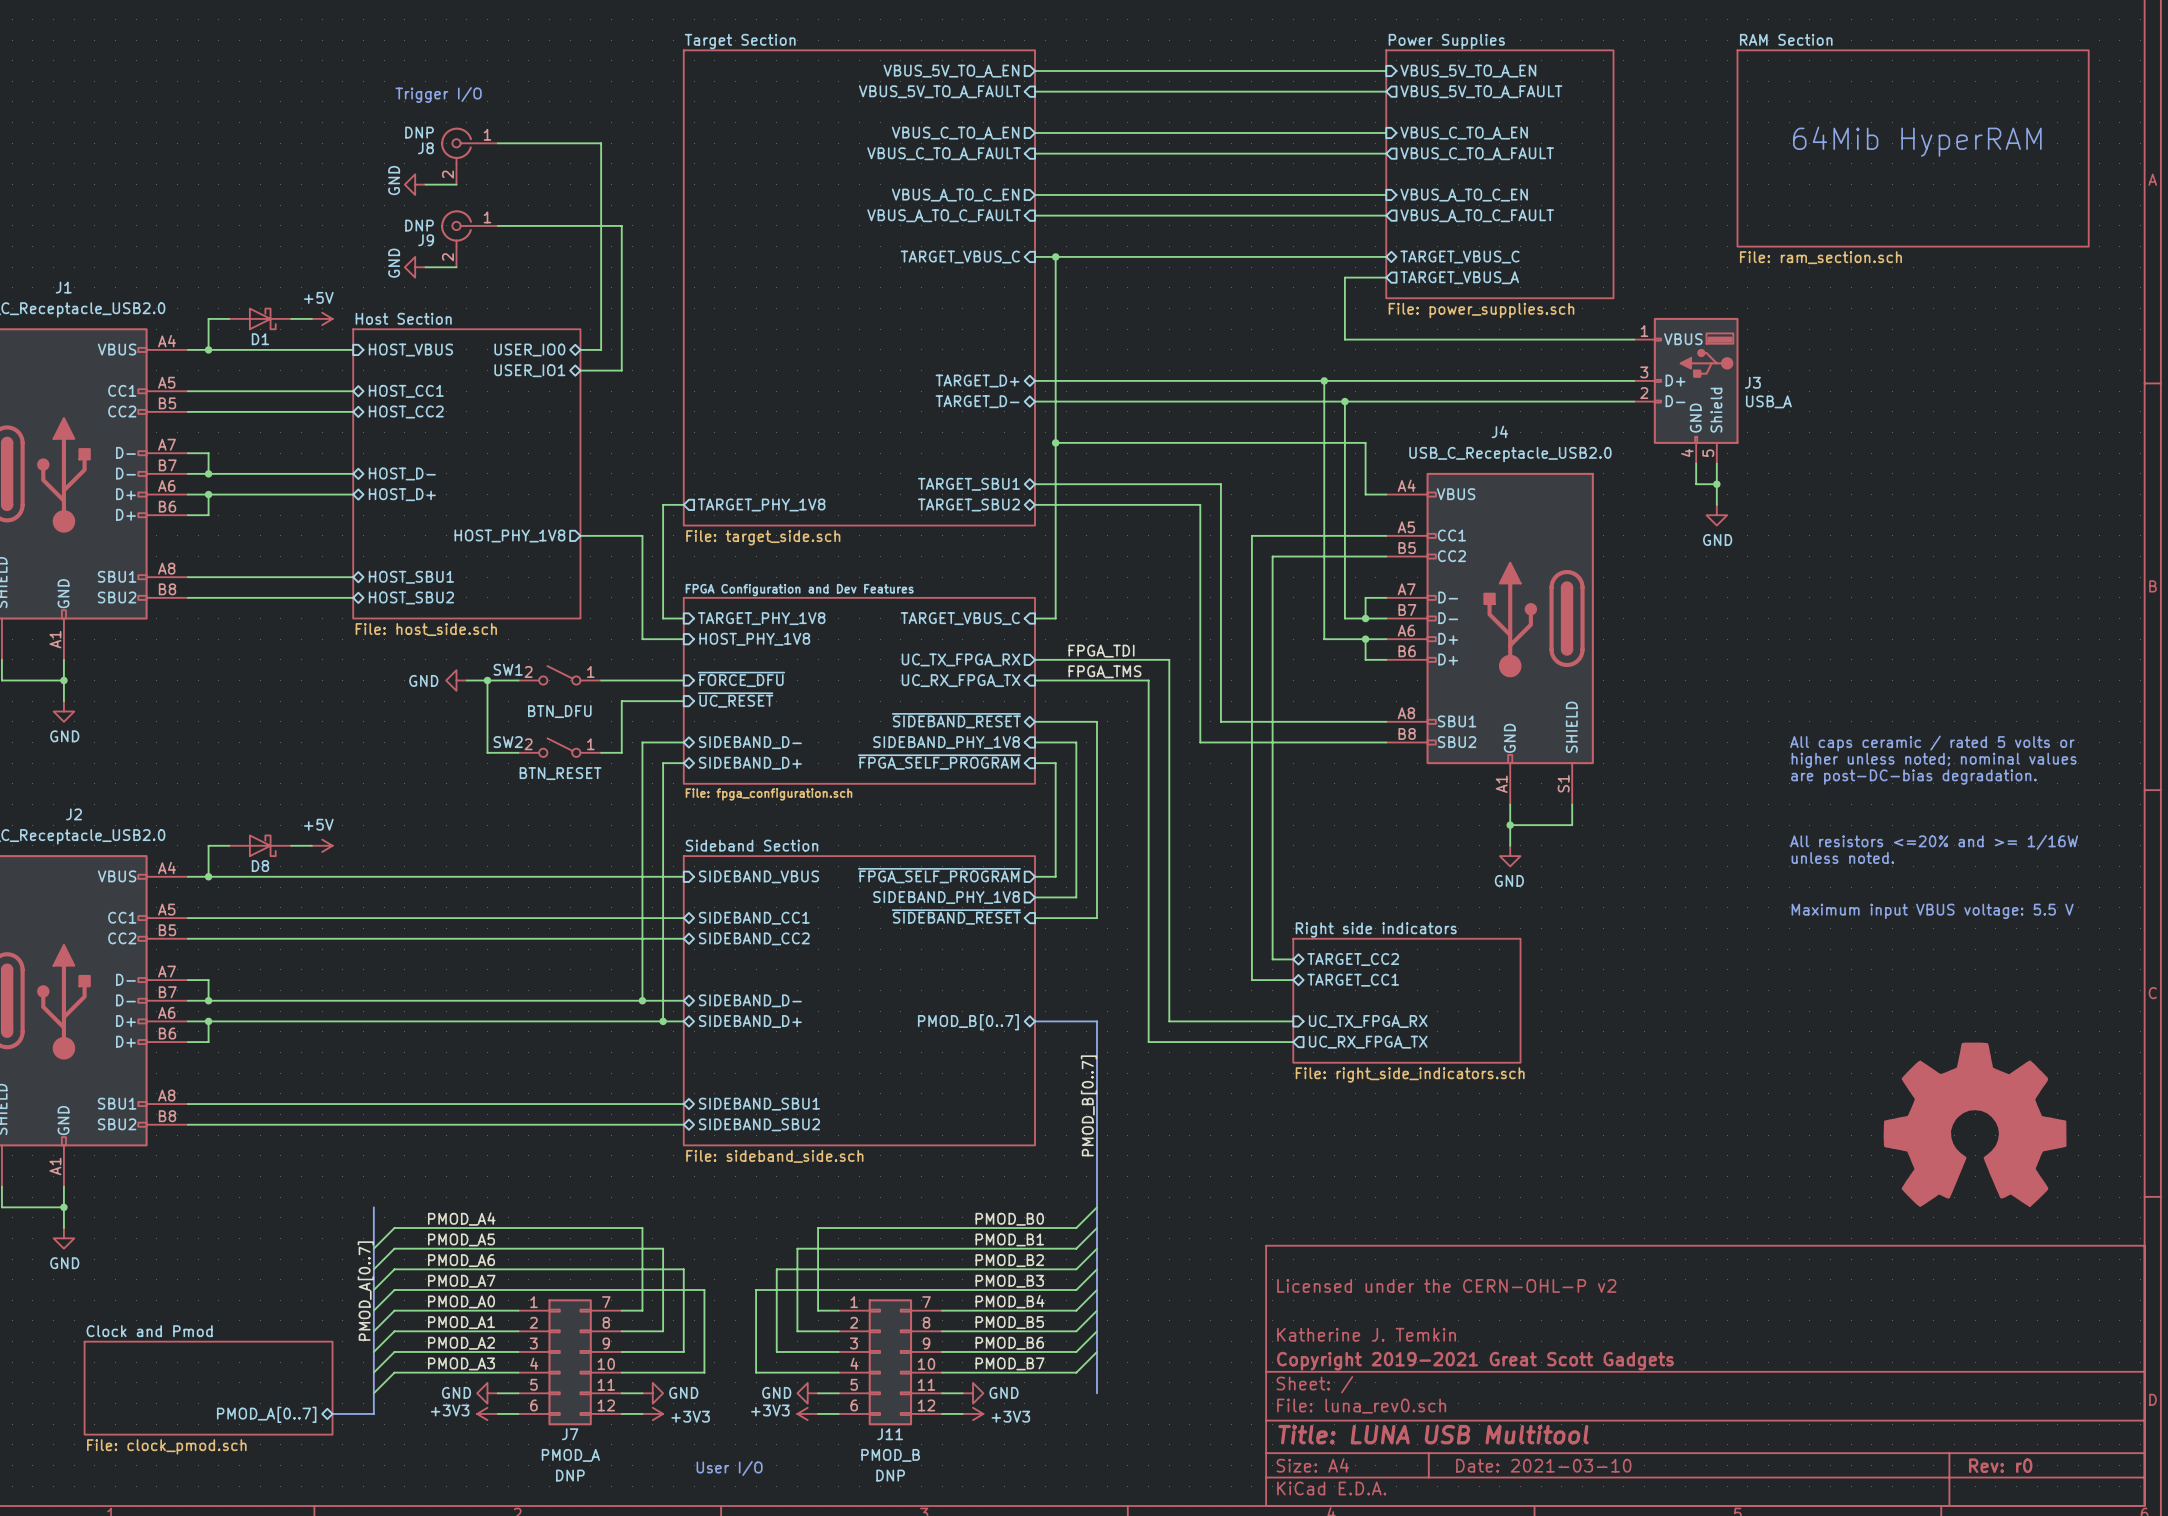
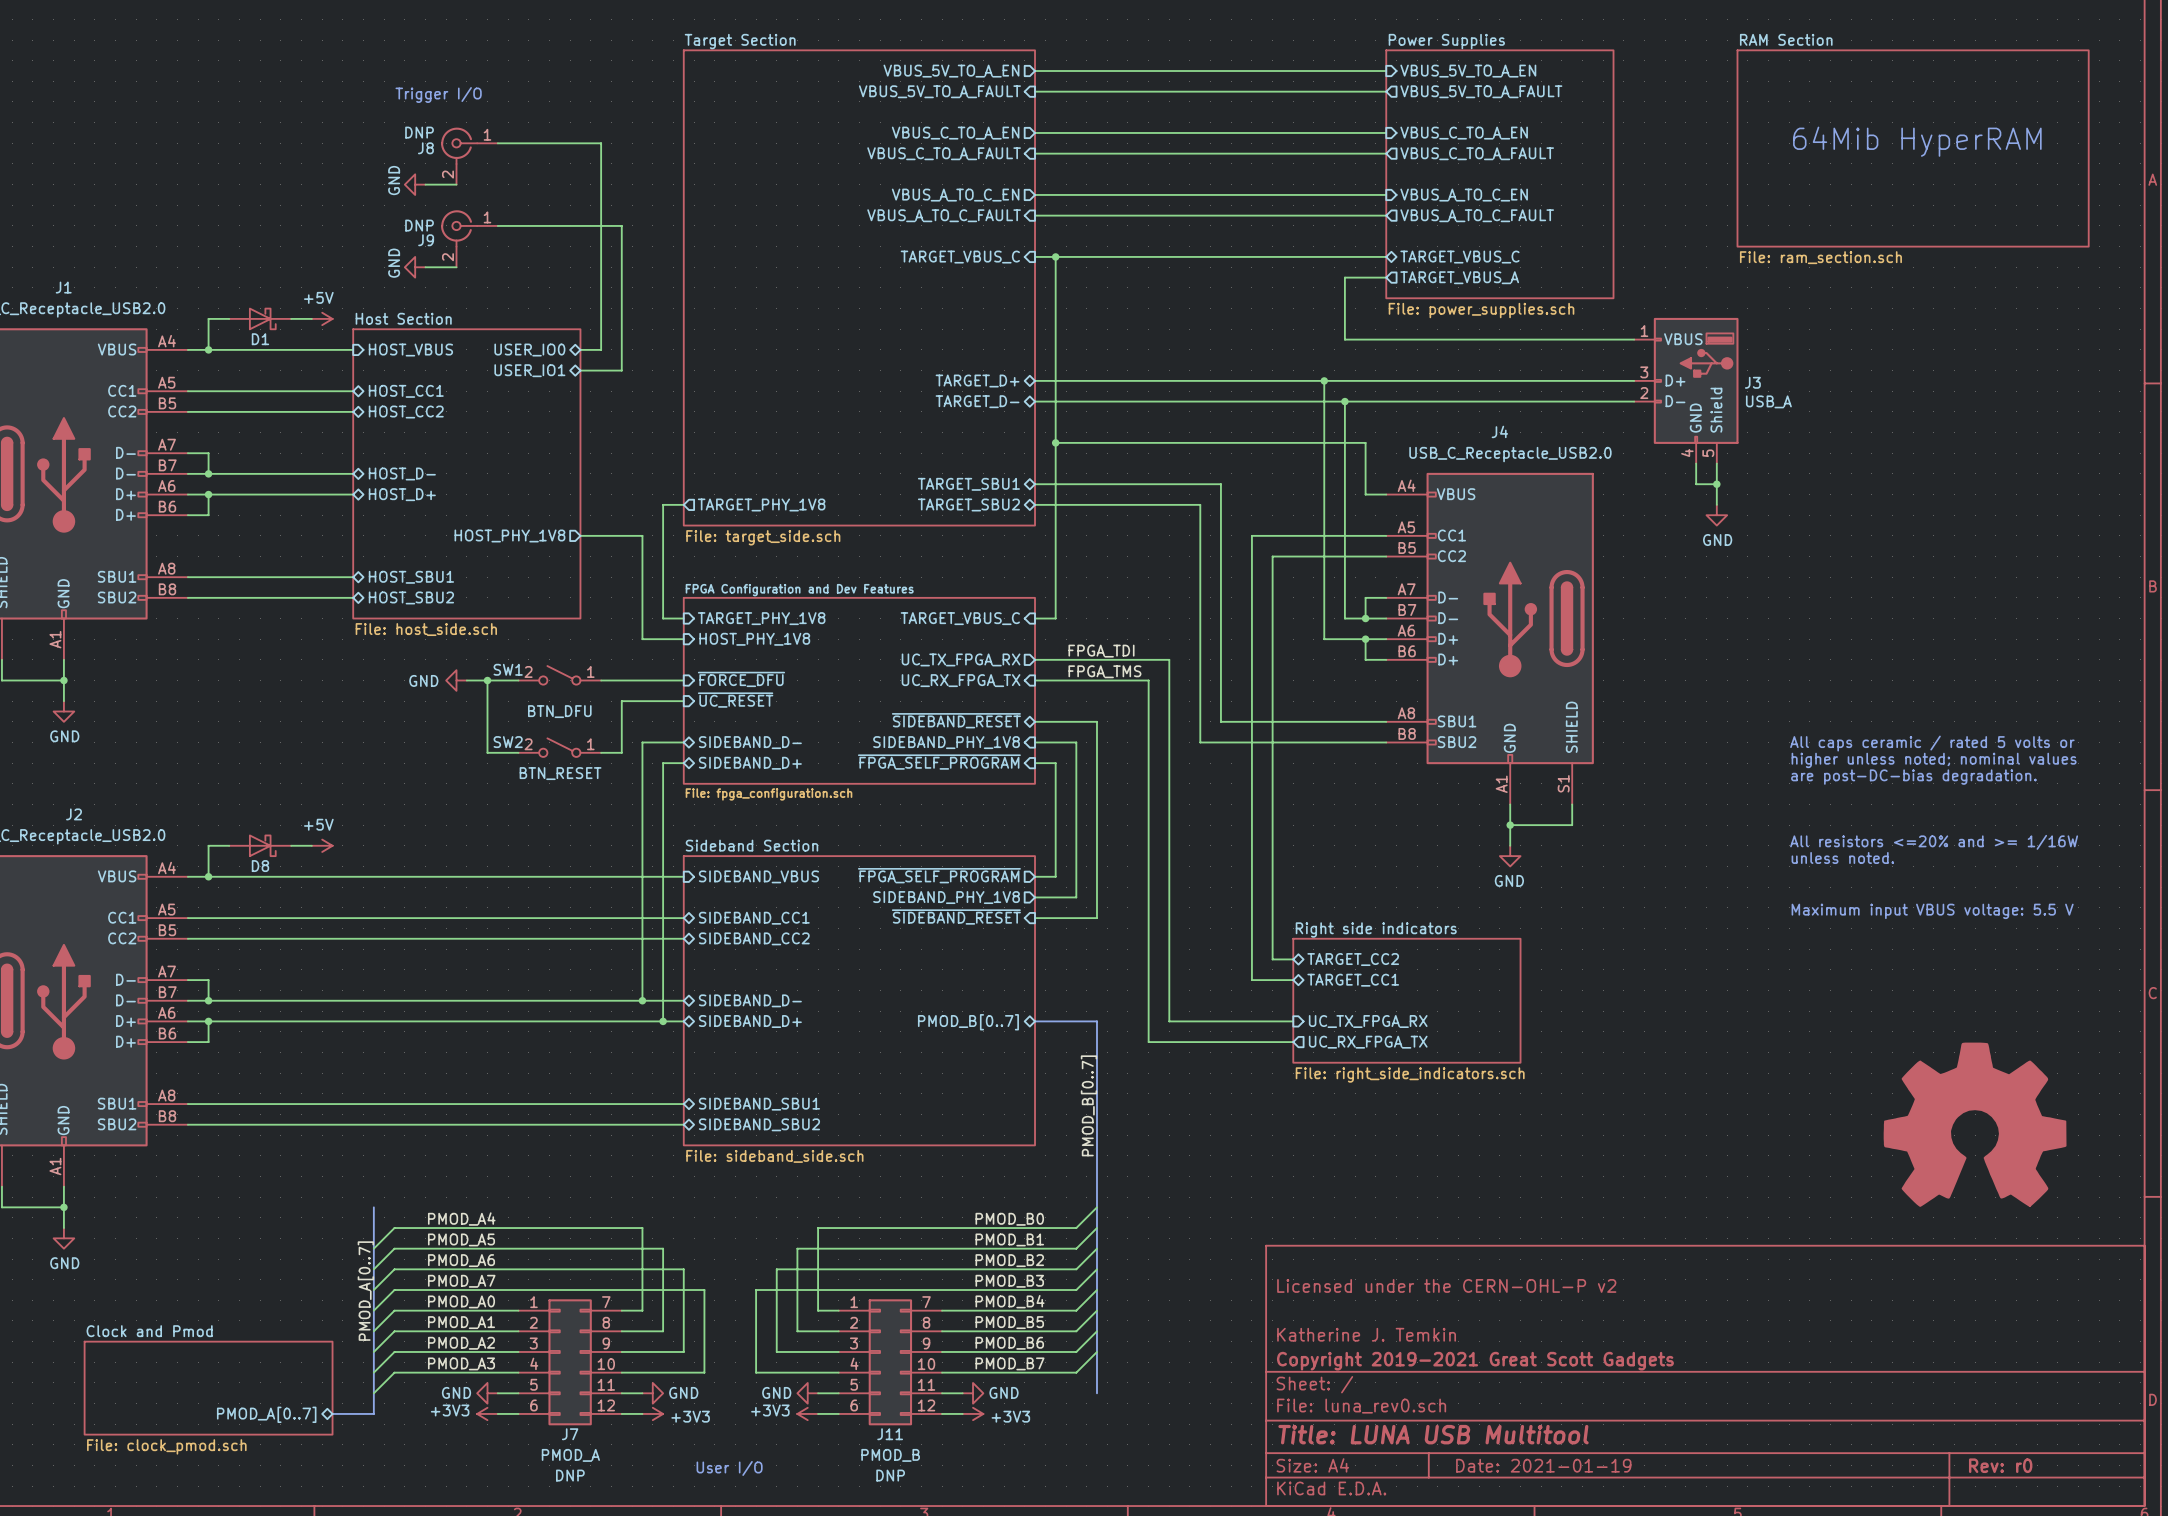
title block: Date: 2021-03-10 (1543, 1465) -> Date: 2021-01-19 (1543, 1465)

